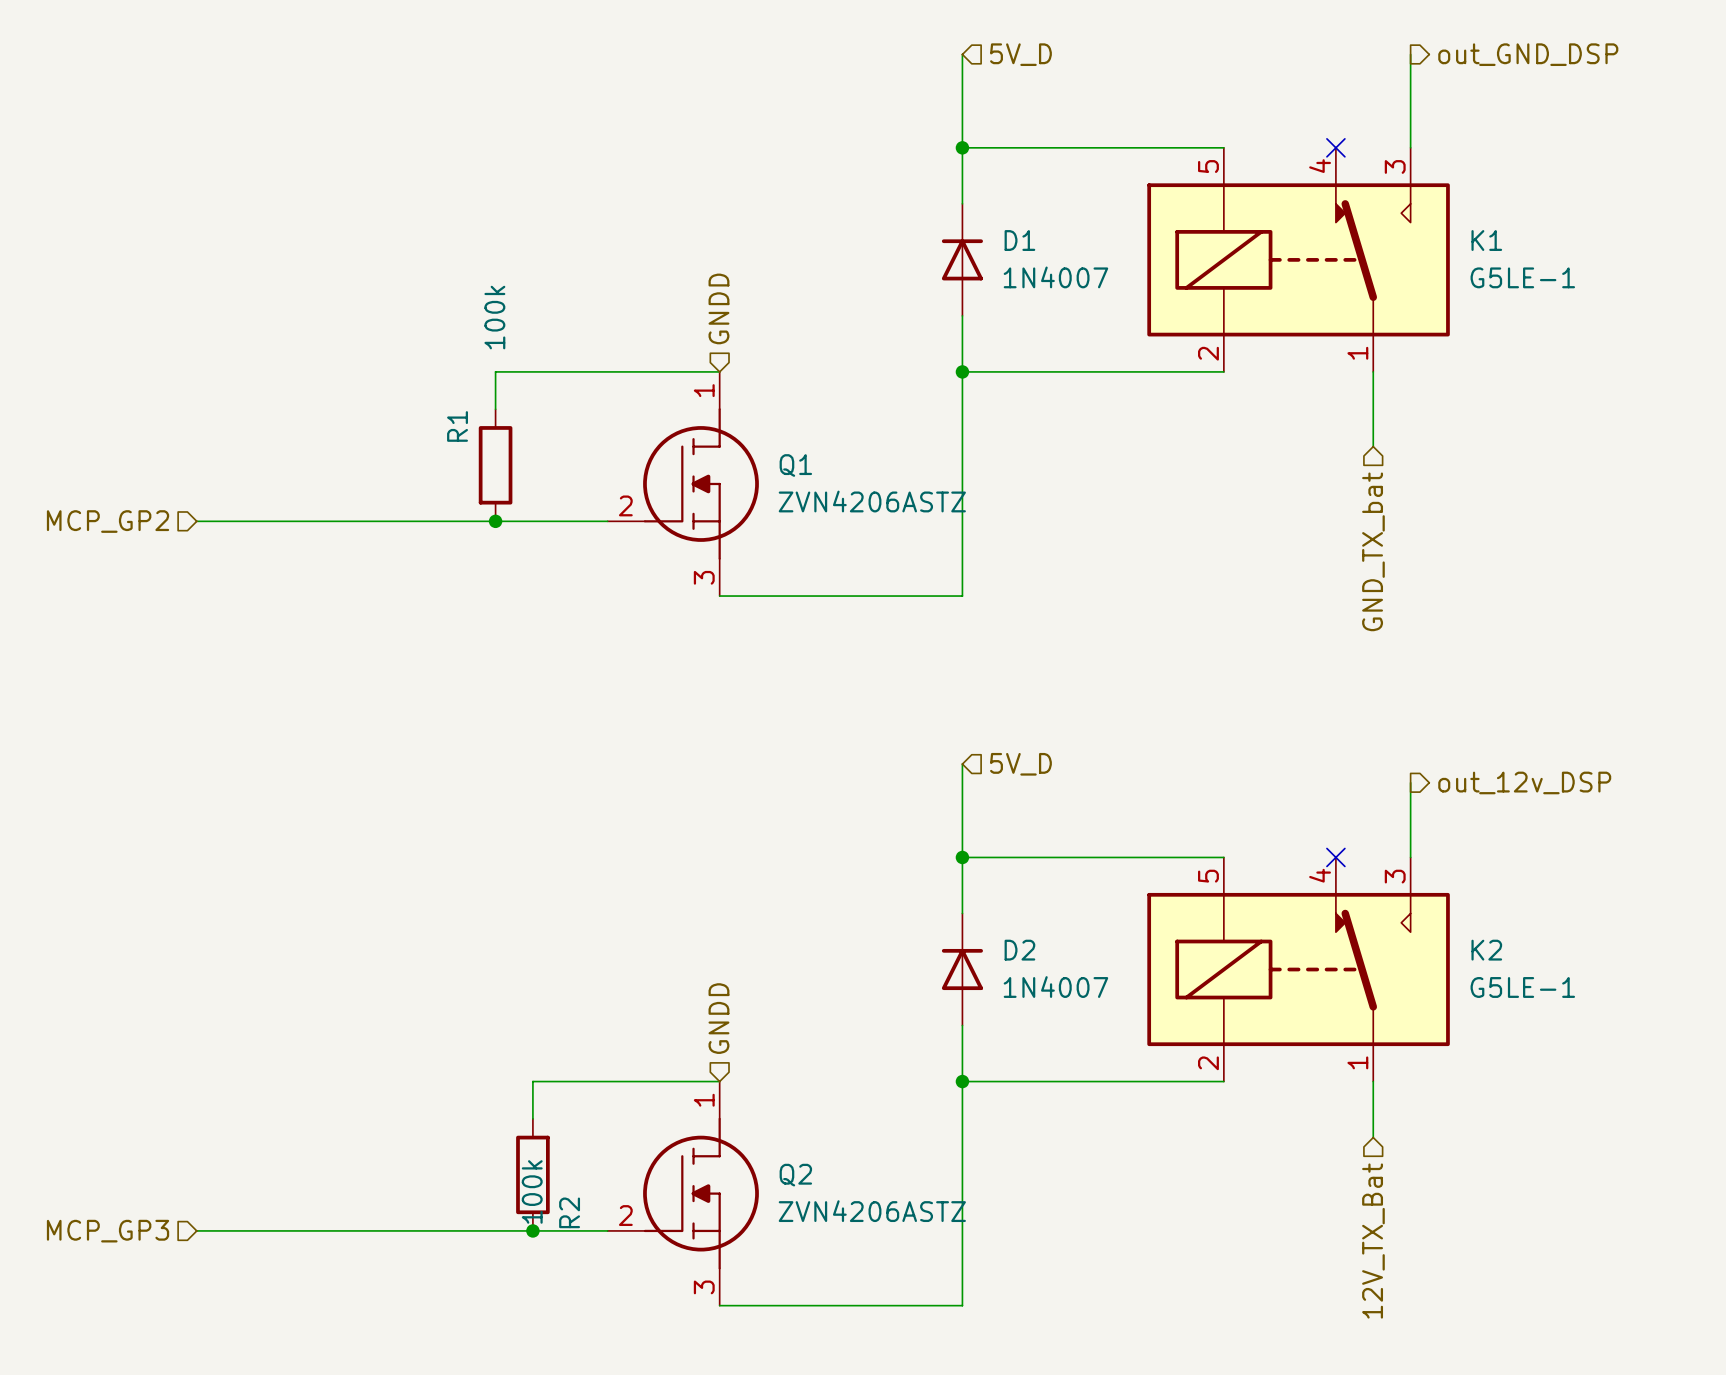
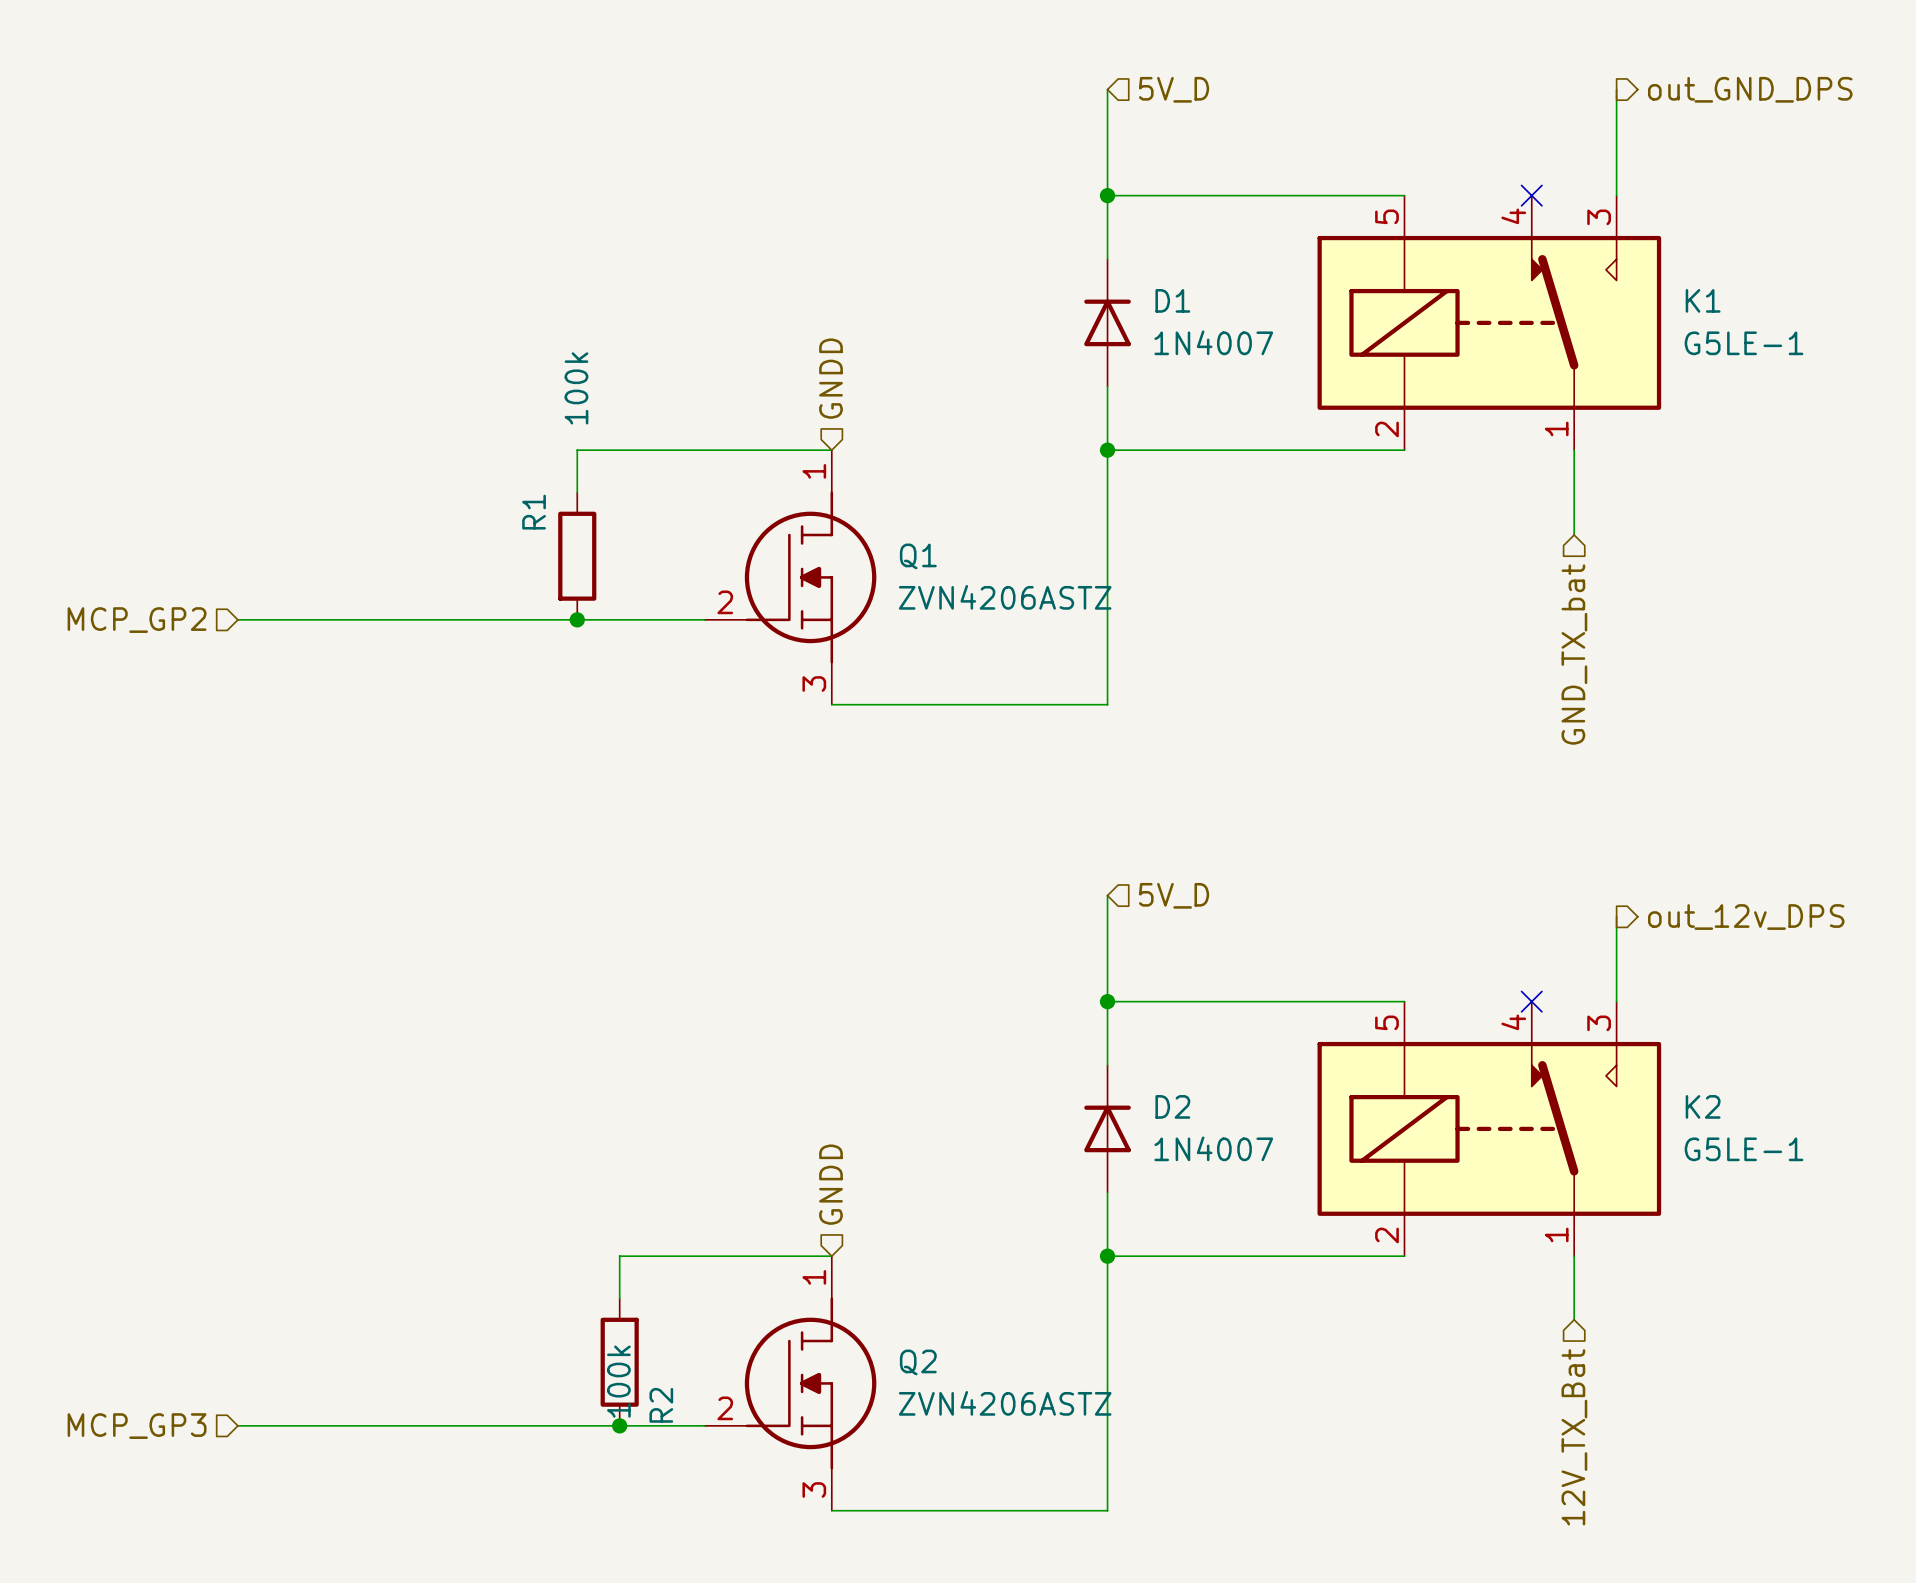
hierarchical label: out_GND_DSP (1528, 54) -> out_GND_DPS (1750, 89)
hierarchical label: out_12v_DSP (1524, 782) -> out_12v_DPS (1746, 917)

